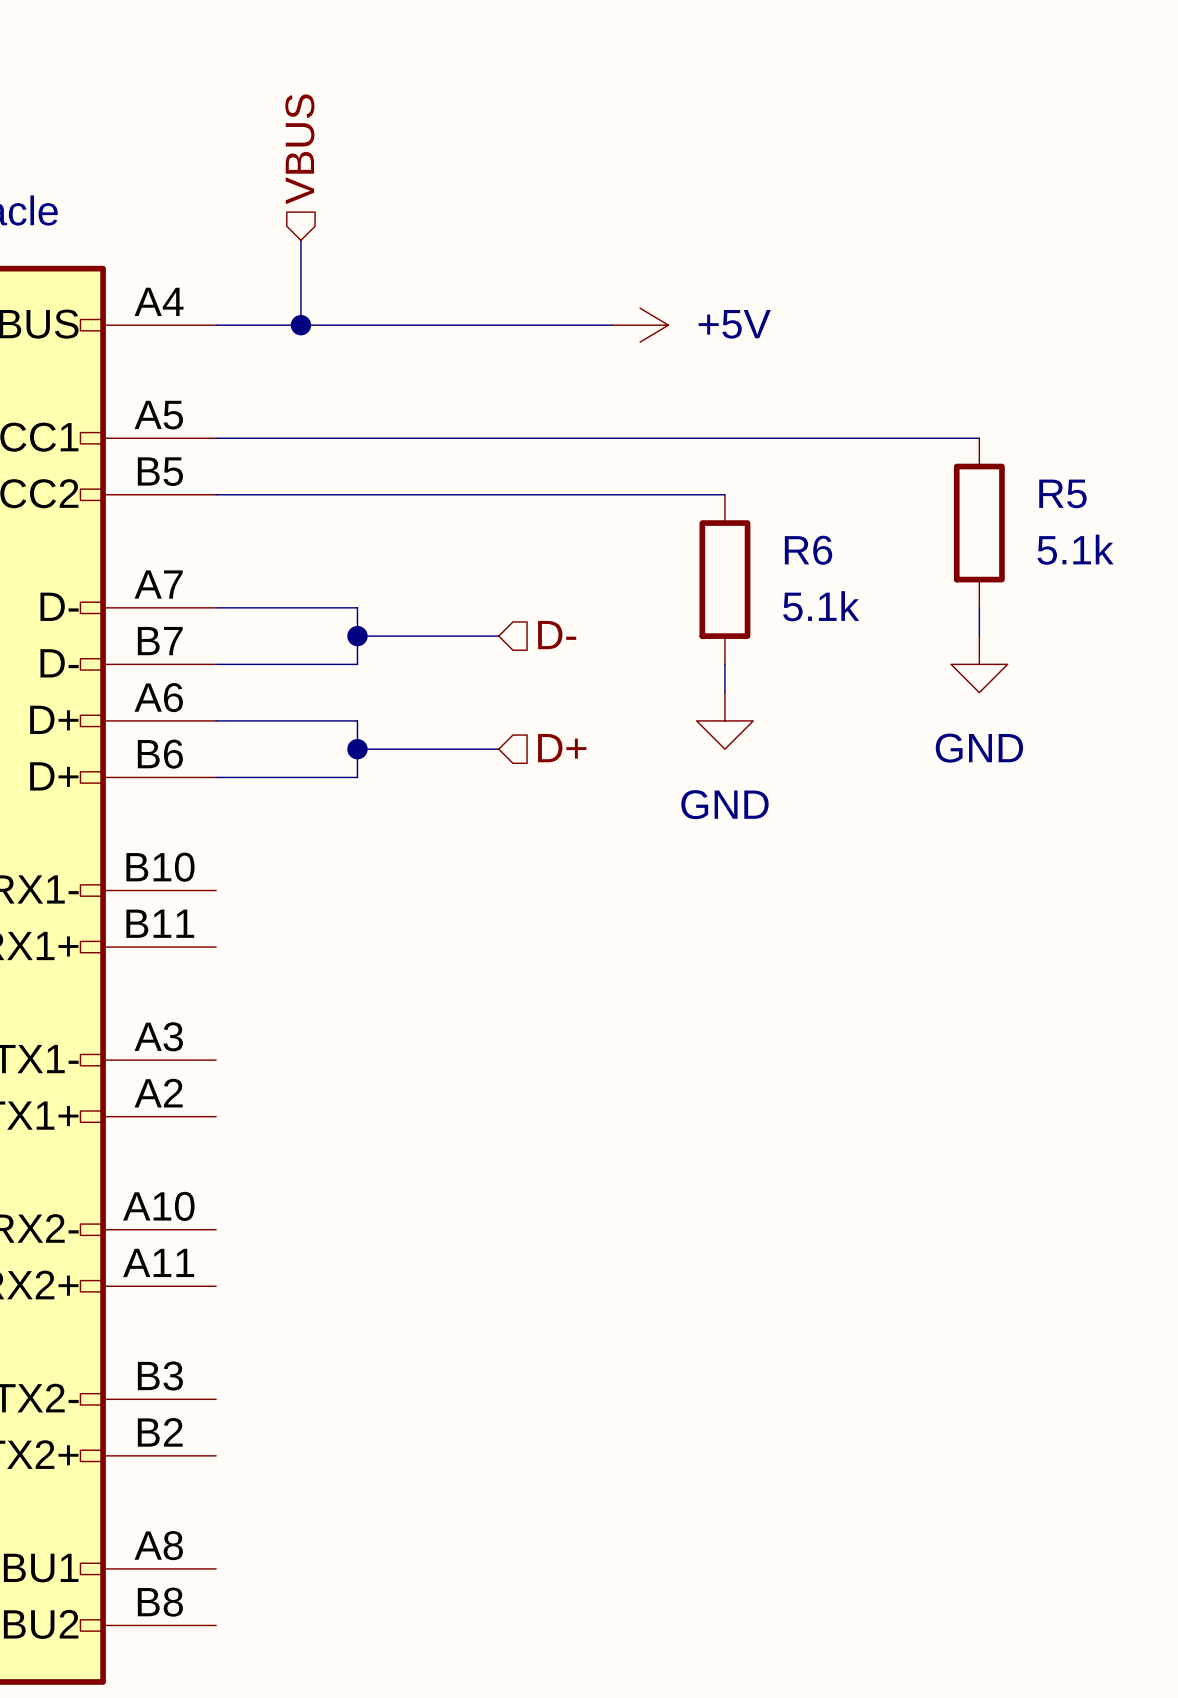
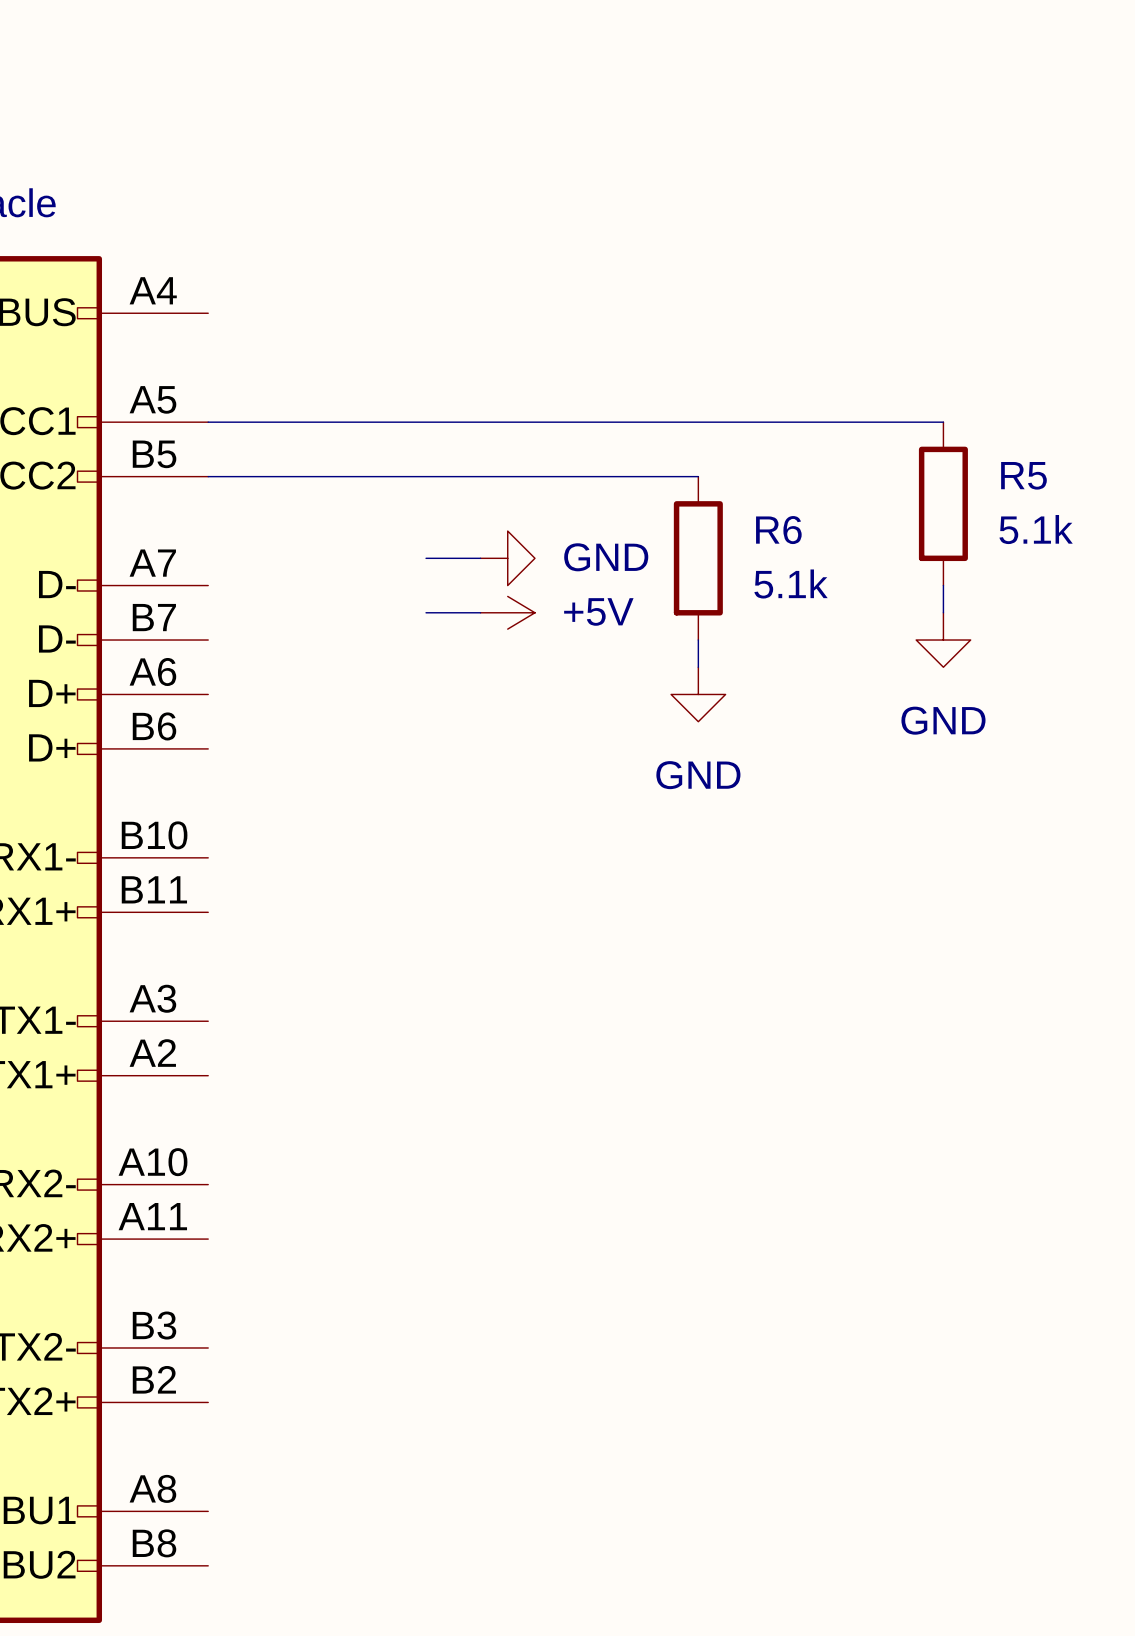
hierarchical label: VBUS (299, 149) -> none
wire: (300, 240) (300, 325) -> none
wire: (216, 325) (611, 325) -> none
junction: (300, 325) -> none
power symbol position: +5V (640, 325) -> +5V (507, 612)
wire: none -> (426, 558) (480, 558)
power symbol: none -> GND (507, 558)
wire: (216, 607) (357, 607) (357, 664) (216, 664) -> none
hierarchical label: D- (557, 635) -> none
wire: (357, 636) (442, 636) -> none
junction: (357, 636) -> none
wire: (216, 720) (357, 720) (357, 777) (216, 777) -> none
hierarchical label: D+ (562, 748) -> none
wire: (357, 749) (498, 749) -> none
junction: (357, 749) -> none

